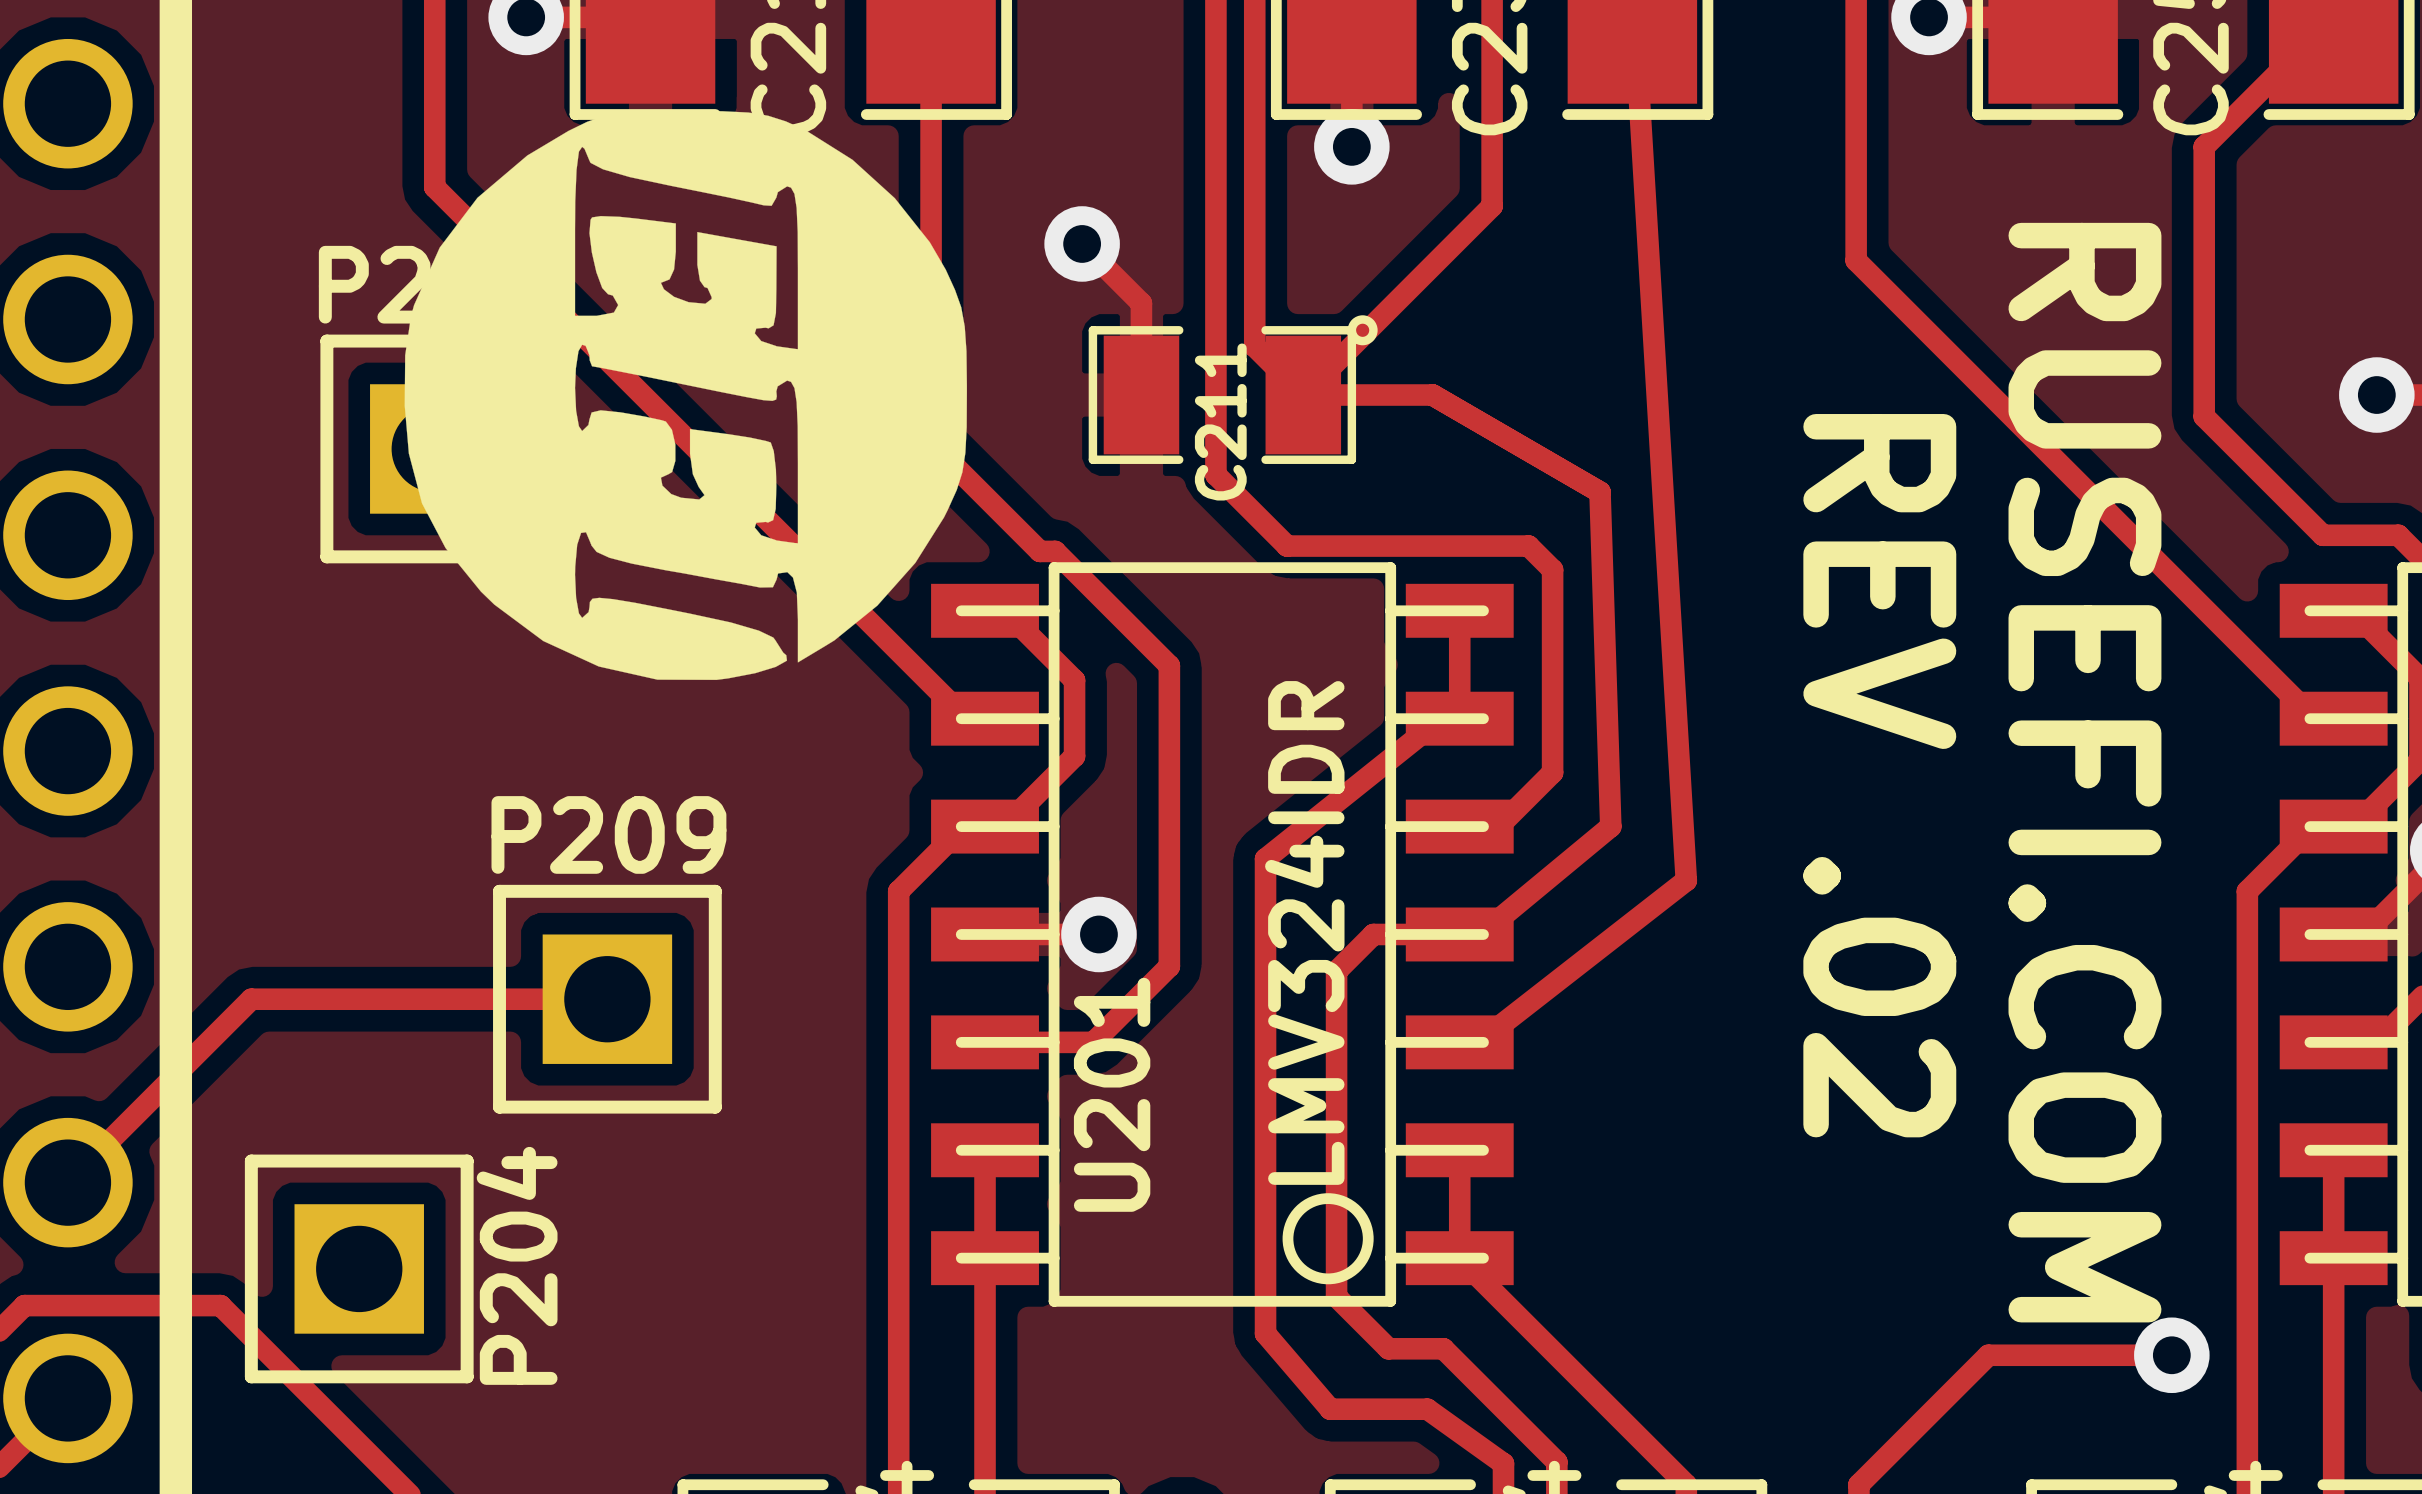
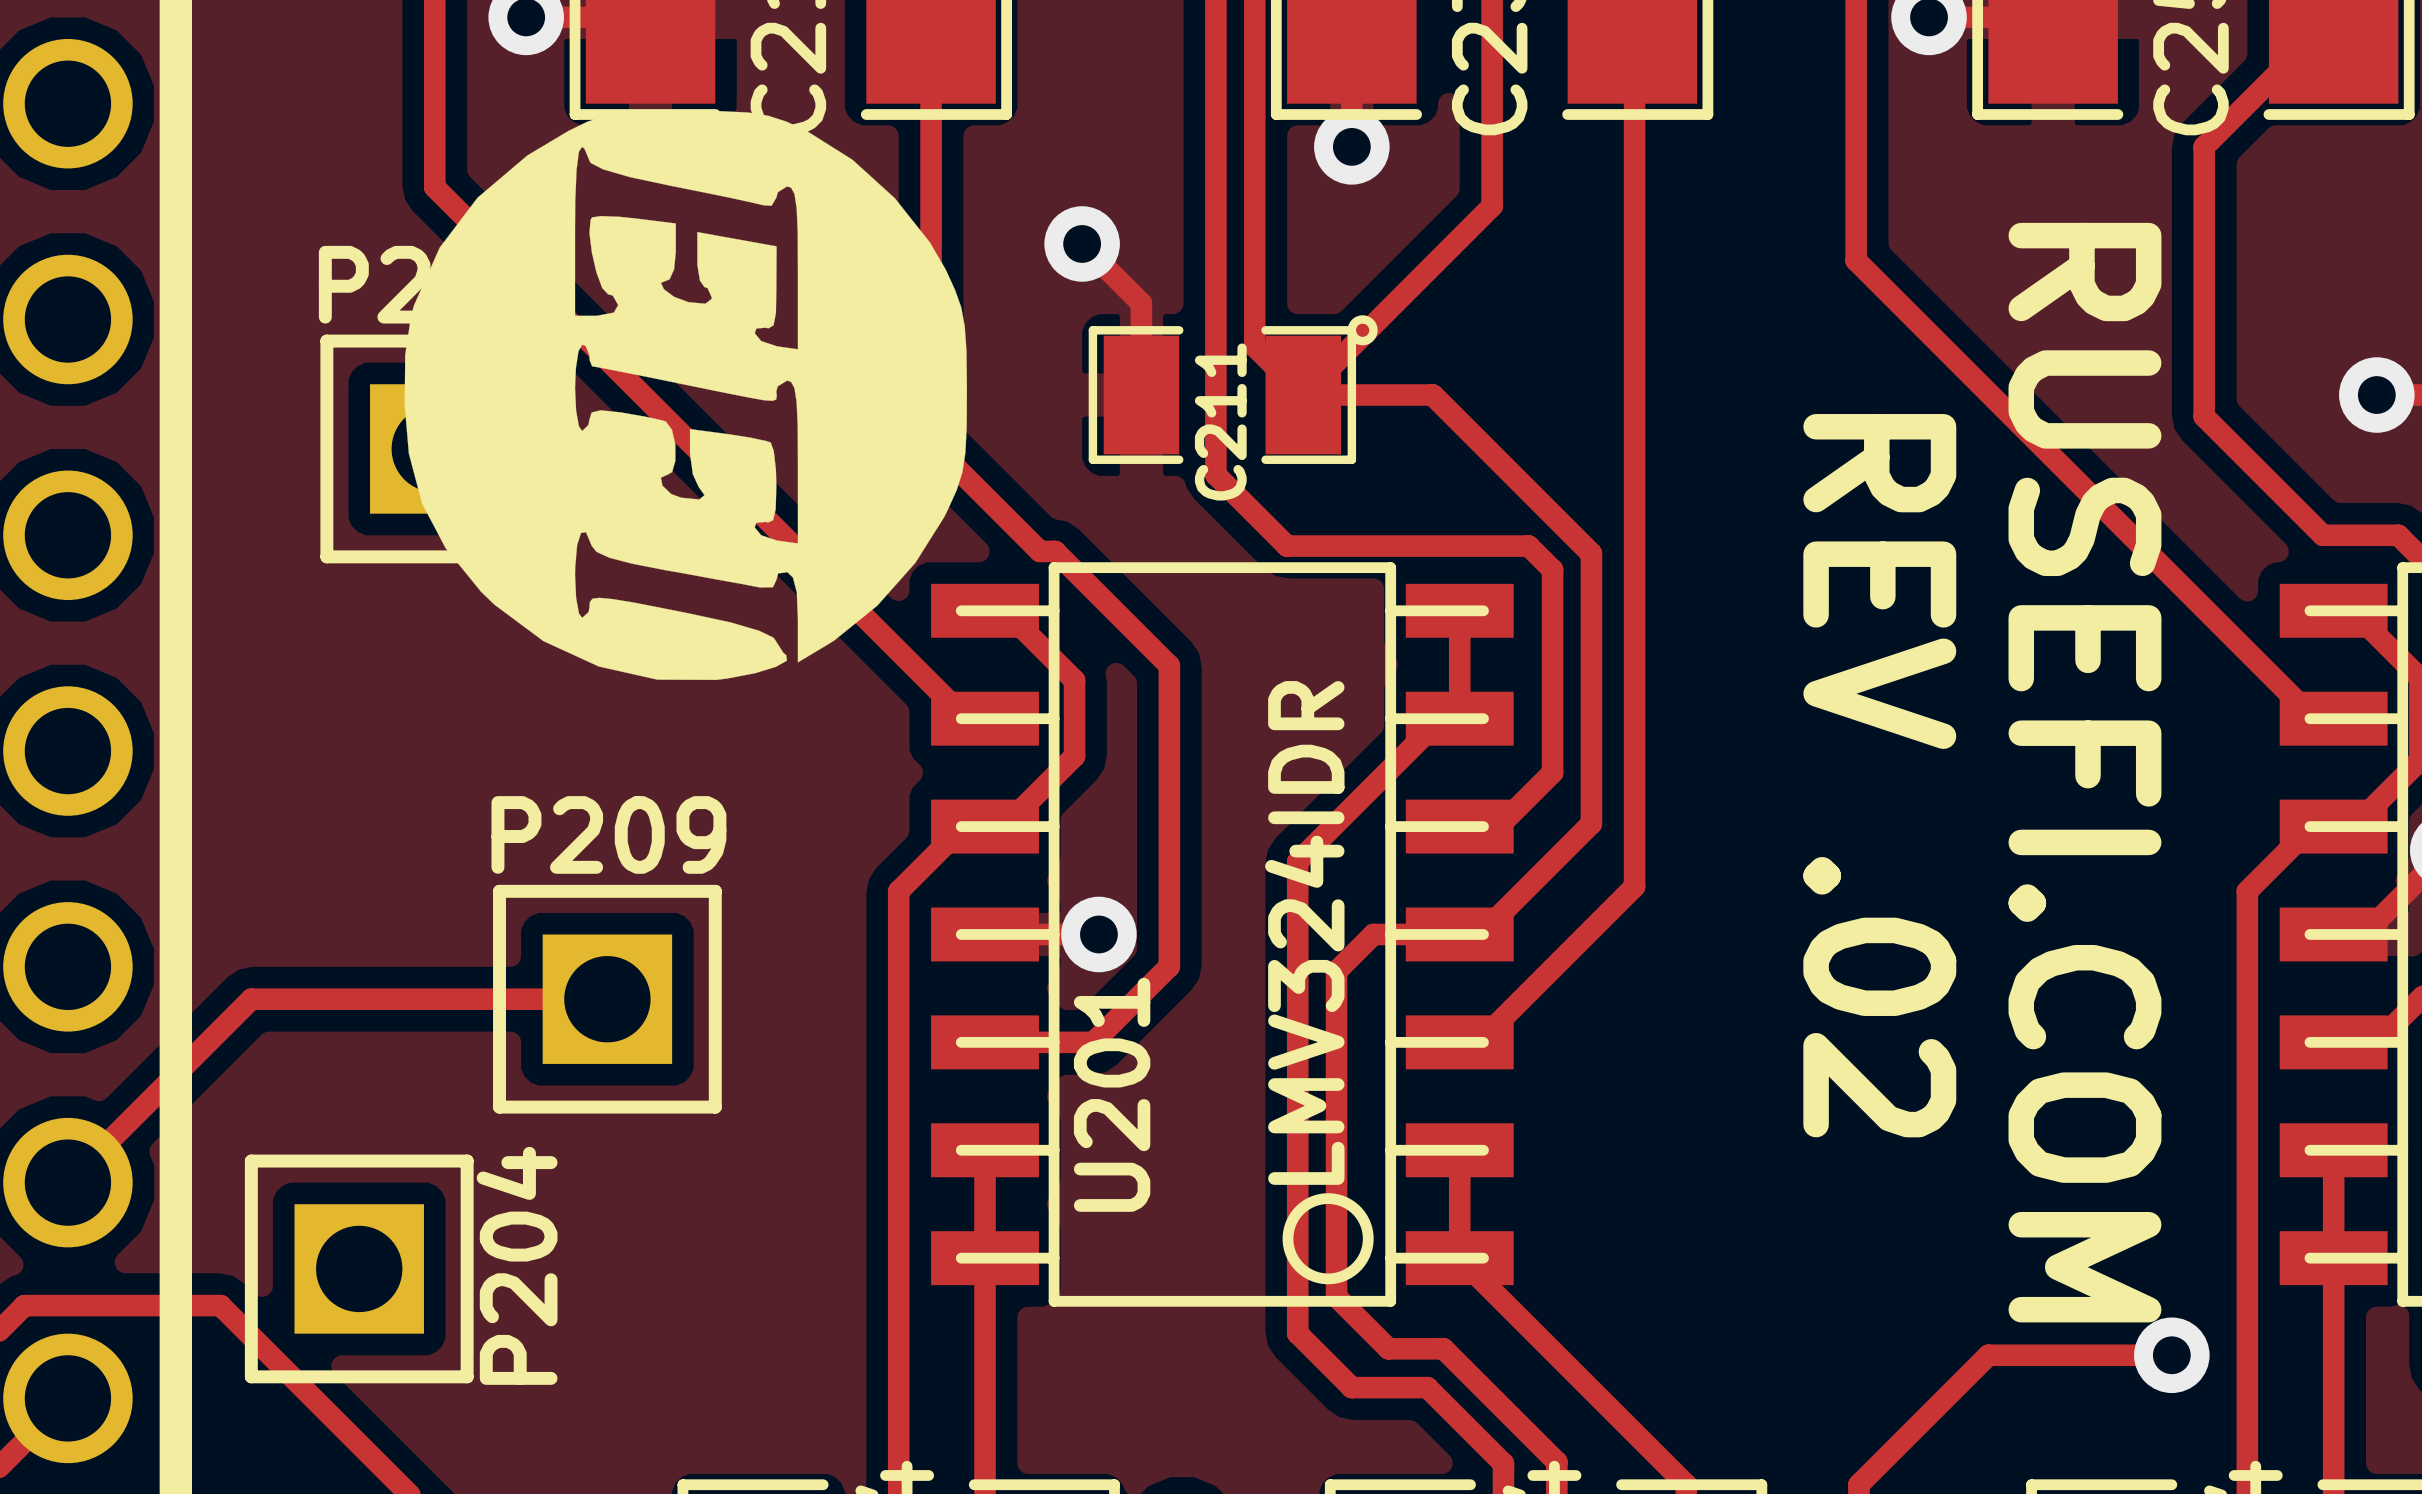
track: (1634, 19) (1686, 880) (1478, 1042) -> (1634, 19) (1634, 886) (1478, 1042)
track: (1600, 492) (1610, 826) (1480, 934) -> (1591, 553) (1591, 823) (1480, 934)
track: (1600, 492) (1432, 395) (1600, 492) -> (1591, 553) (1432, 395) (1591, 553)
track: (1440, 718) (1265, 858) (1265, 1333) (1330, 1409) (1427, 1409) (1503, 1463) -> (1440, 718) (1297, 861) (1297, 1333) (1351, 1387) (1427, 1387) (1503, 1463)

